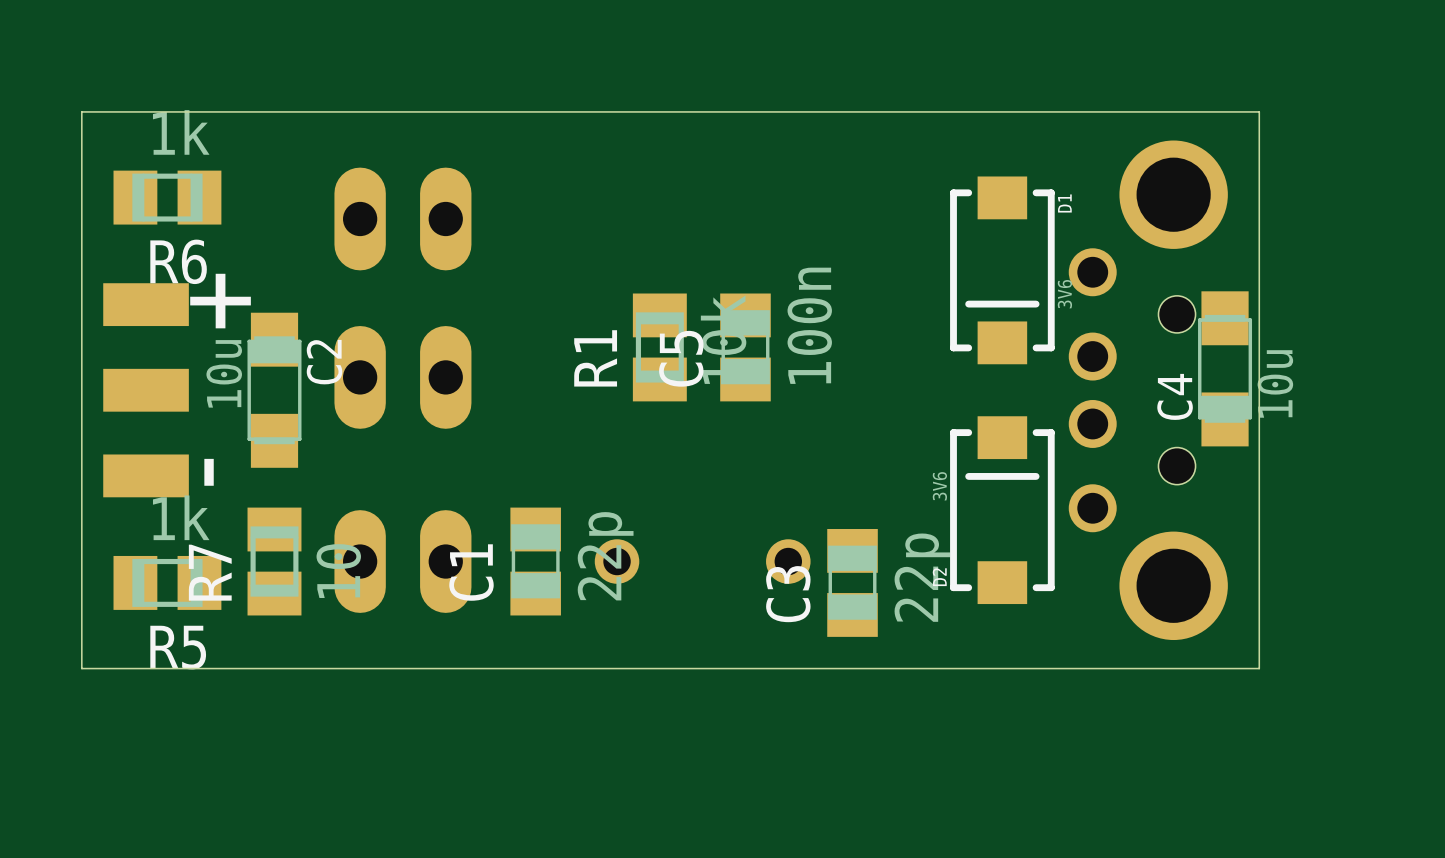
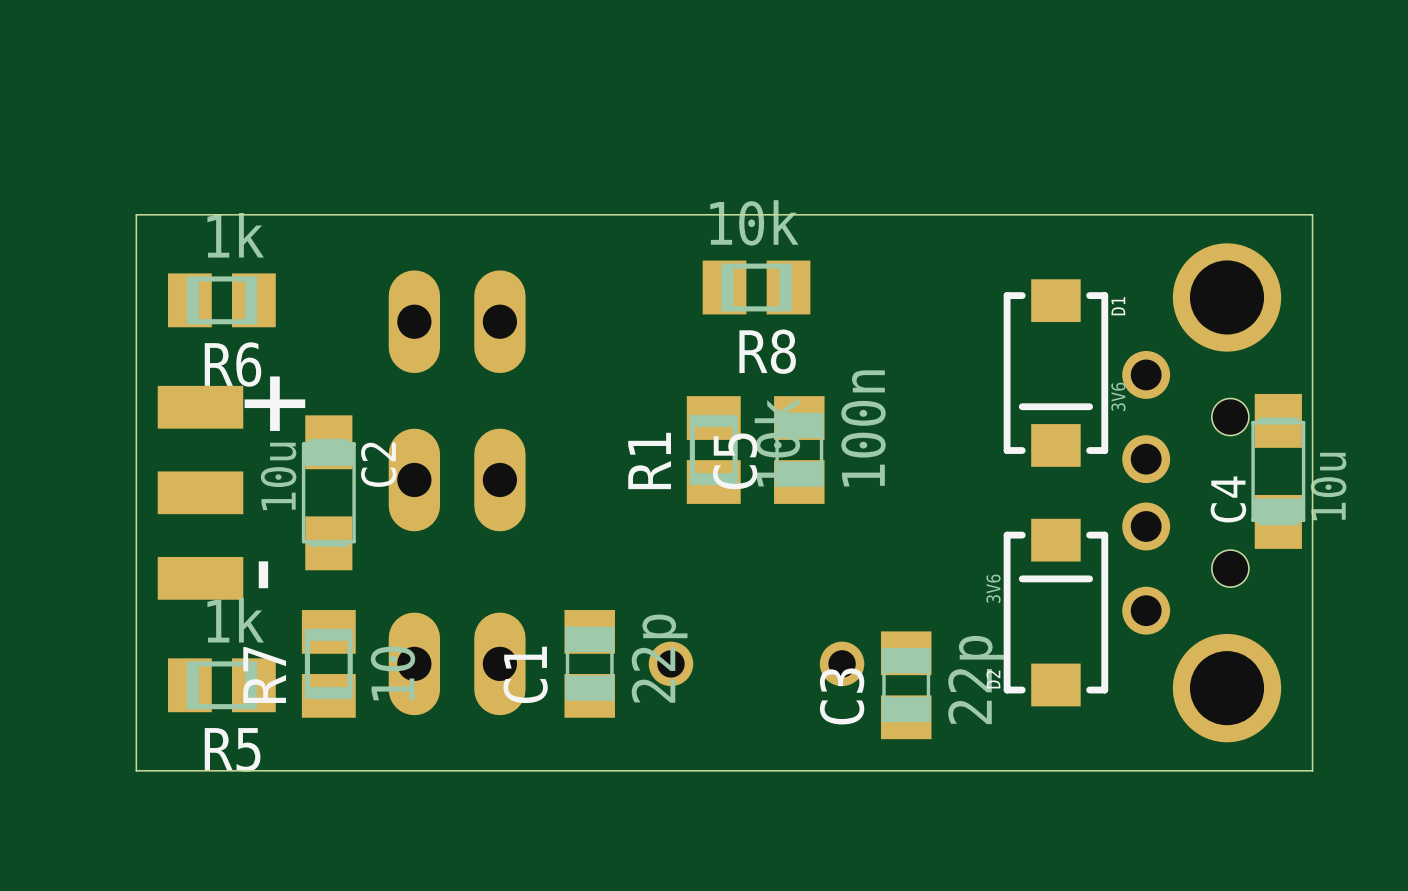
R8: none -> 10k (756, 287)

